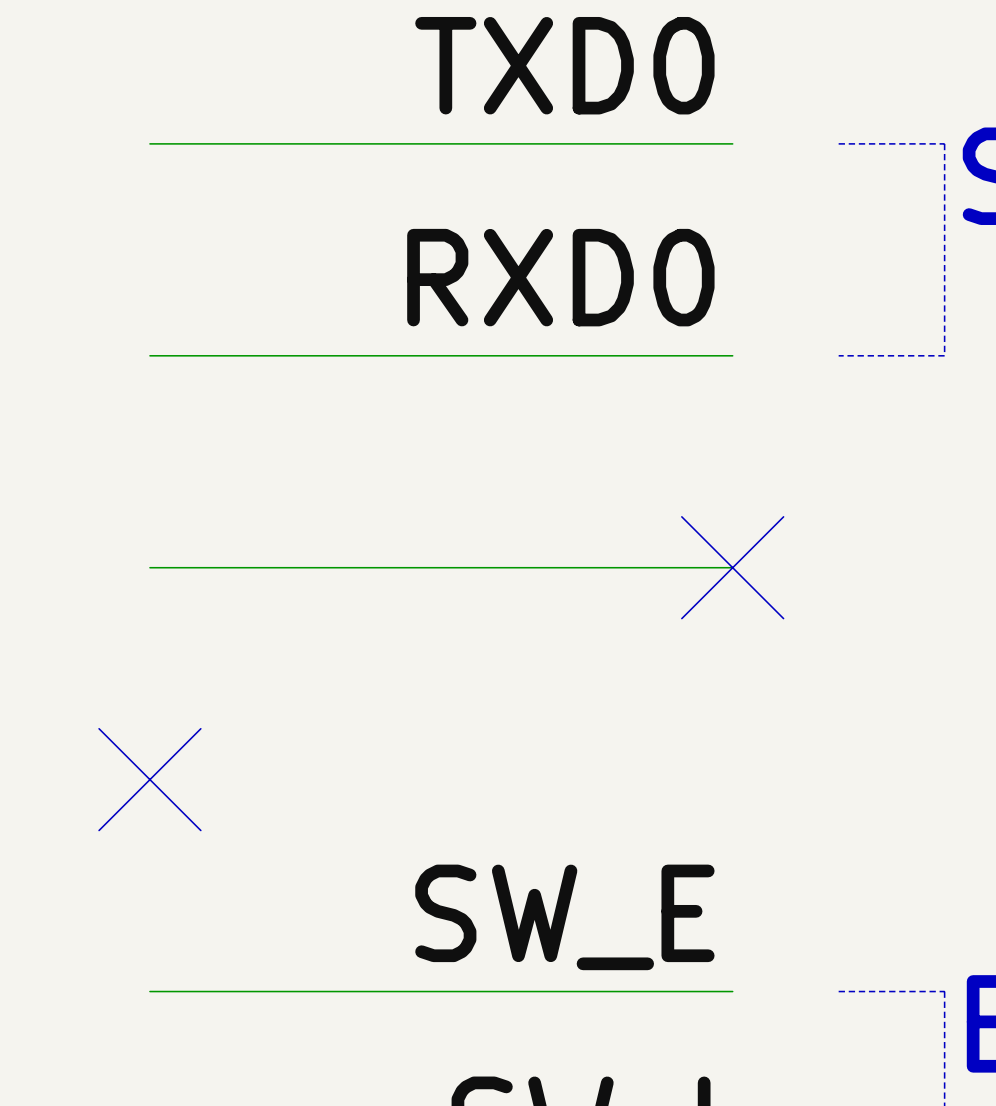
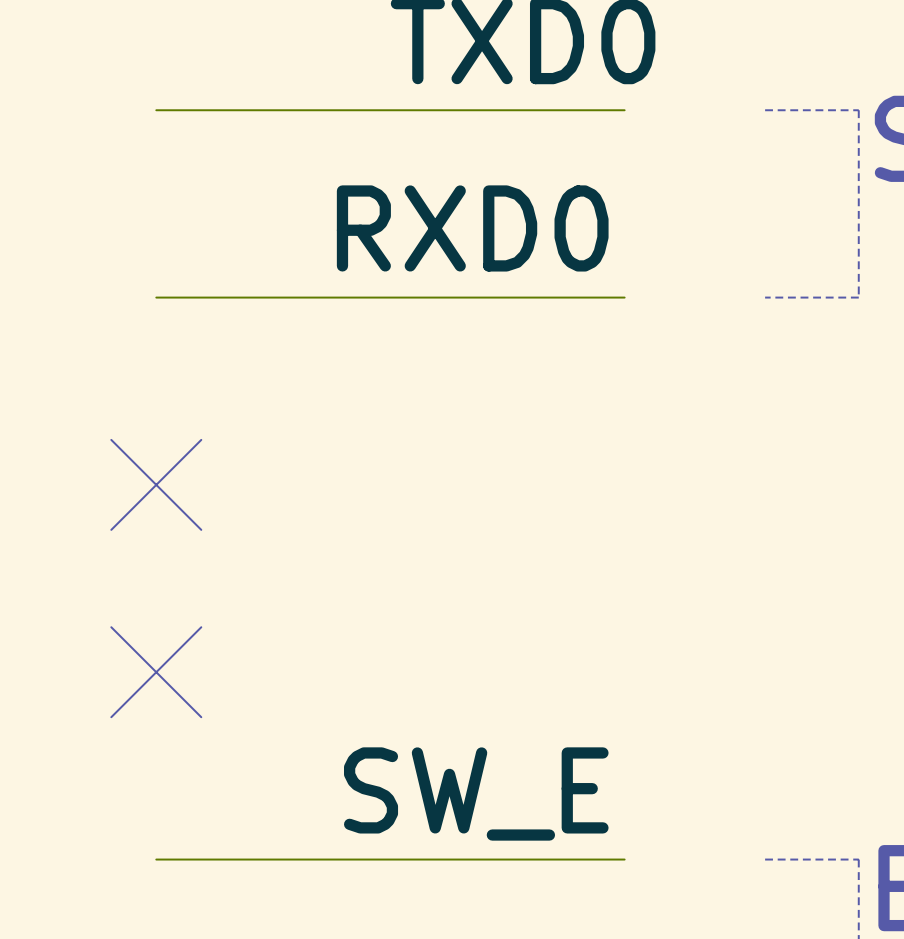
wire: (679, 143) (732, 143) -> none
label position: RXD0 (560, 277) -> RXD0 (472, 228)
wire: (679, 355) (732, 355) -> none
wire: (149, 567) (732, 567) -> none
no-connect mark: none -> (156, 484)
no-connect mark: (732, 567) -> none
label position: SW_E (564, 917) -> SW_E (476, 794)
wire: (679, 991) (732, 991) -> none

